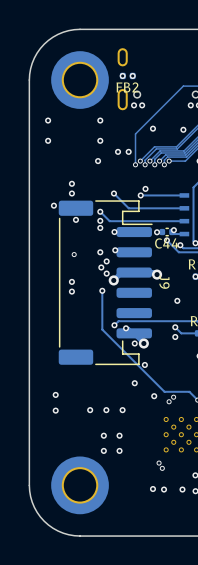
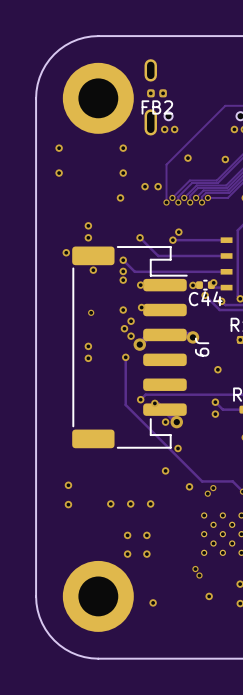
via: none -> (209, 596)
via: (152, 489) -> none
via: (164, 489) -> none
via: (182, 489) -> none
via: none -> (153, 602)

